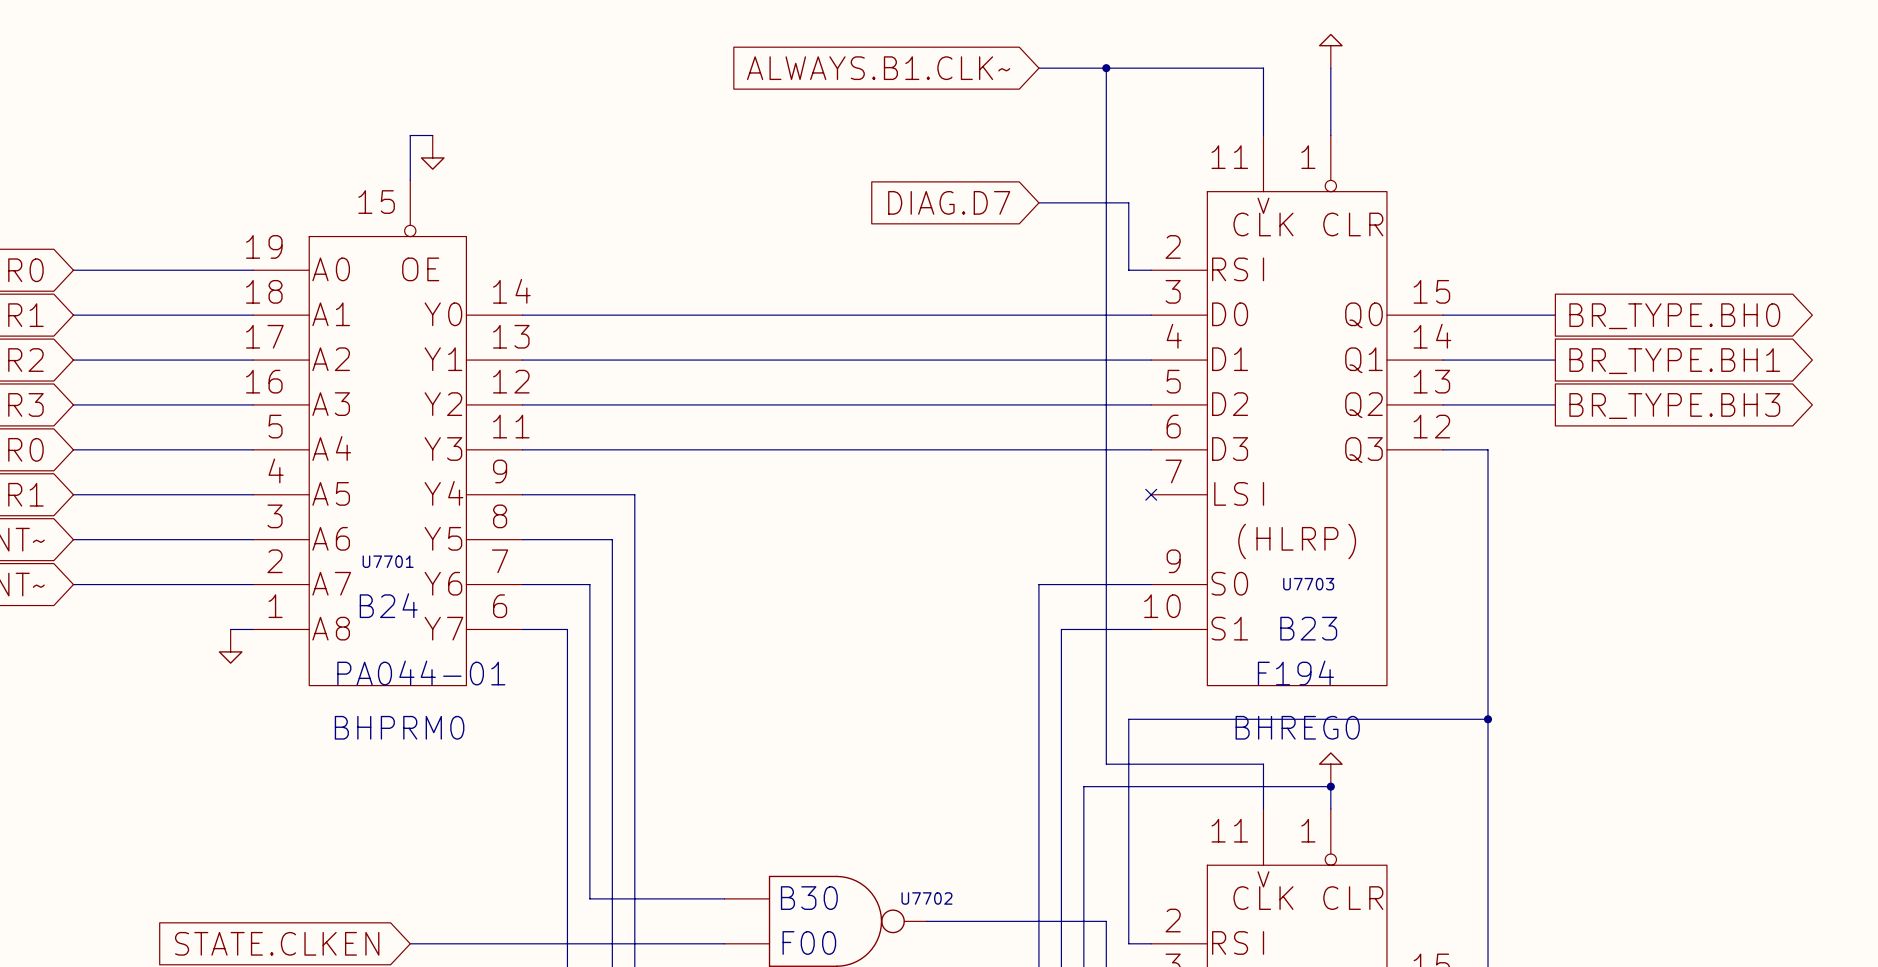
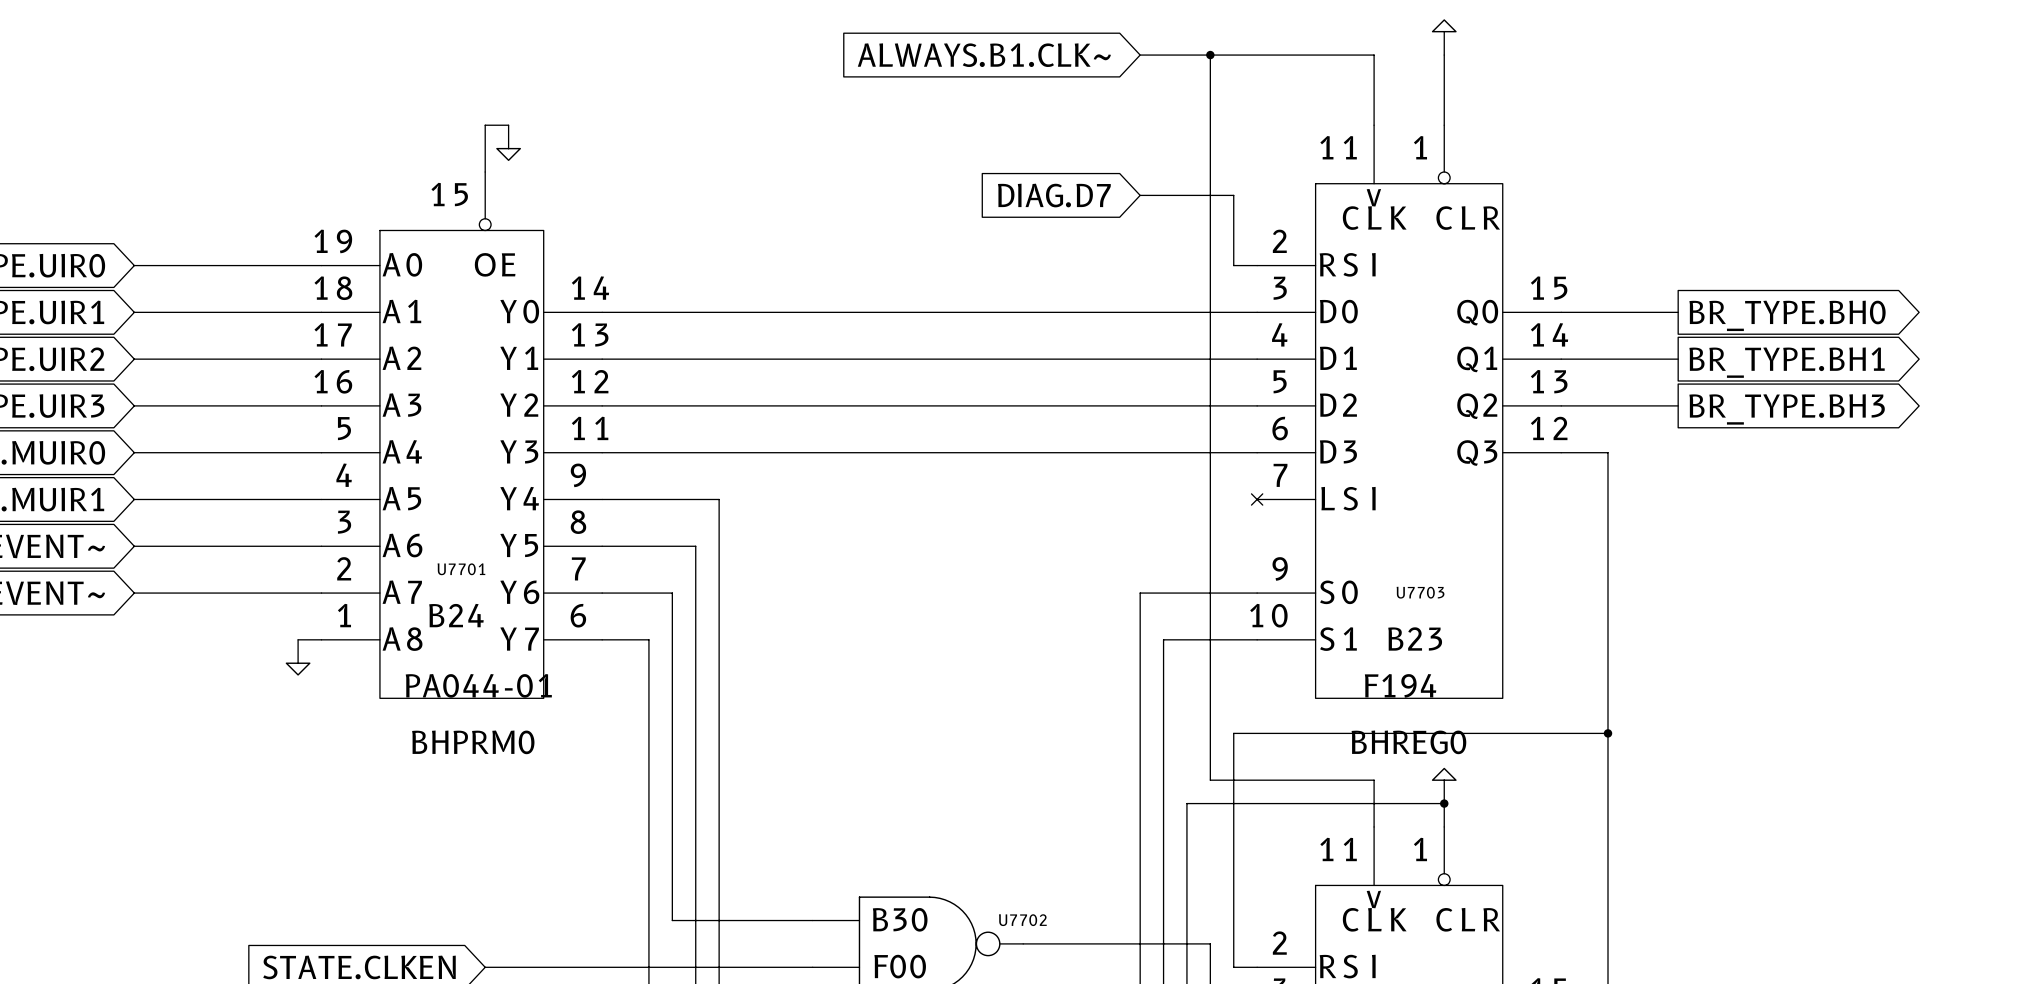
U7703 text: H (1263, 538) -> none
U7703 text: L (1287, 538) -> none
U7703 text: R (1308, 538) -> none
U7703 text: P (1331, 538) -> none
U7703 text: ( (1242, 541) -> none
U7703 text: ) (1352, 541) -> none

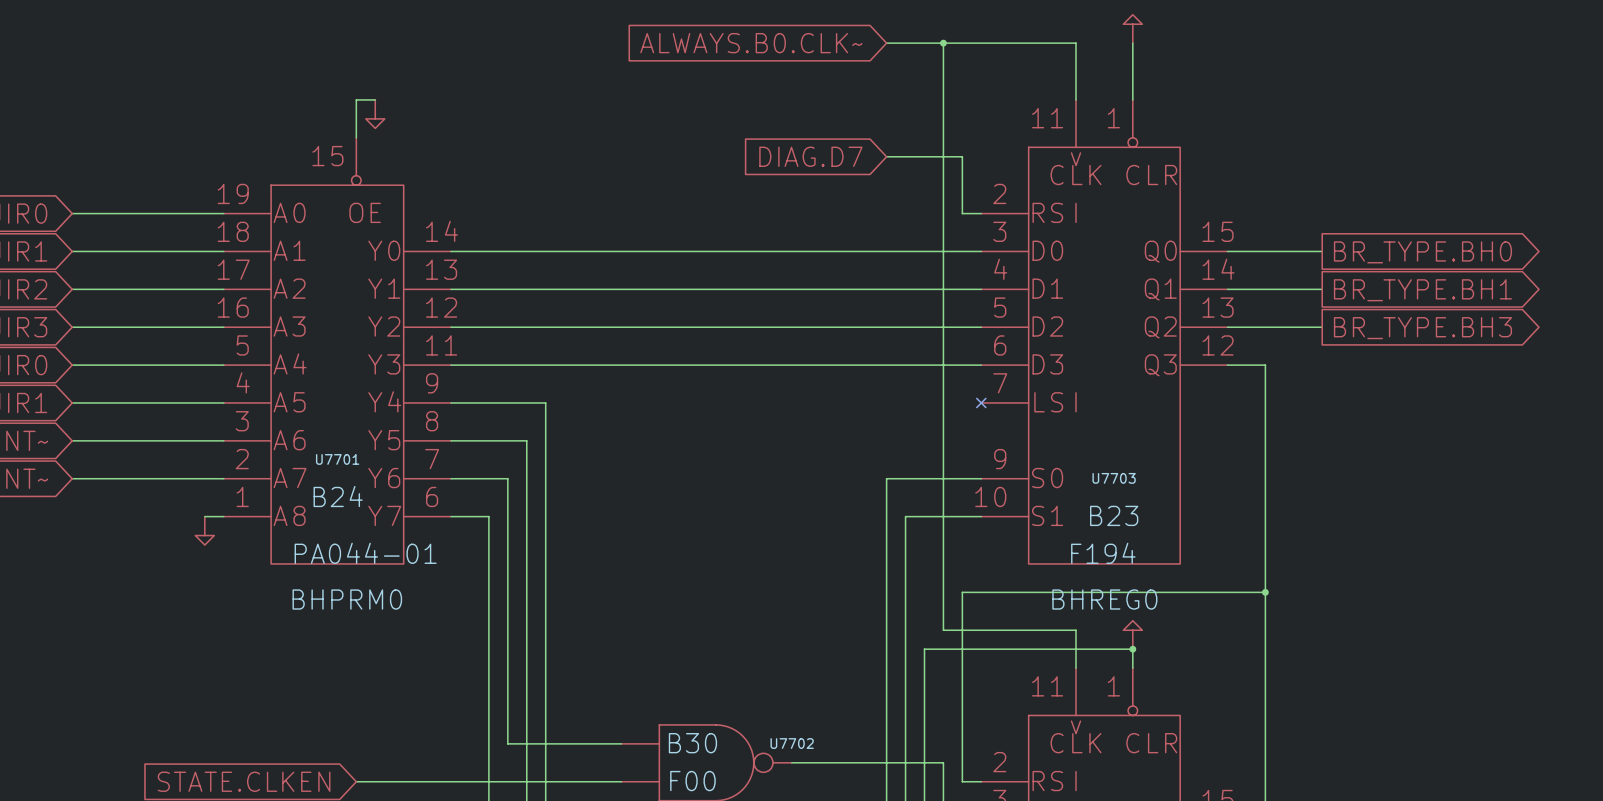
global label: ALWAYS.B1.CLK~ (984, 55) -> ALWAYS.B0.CLK~ (751, 43)

